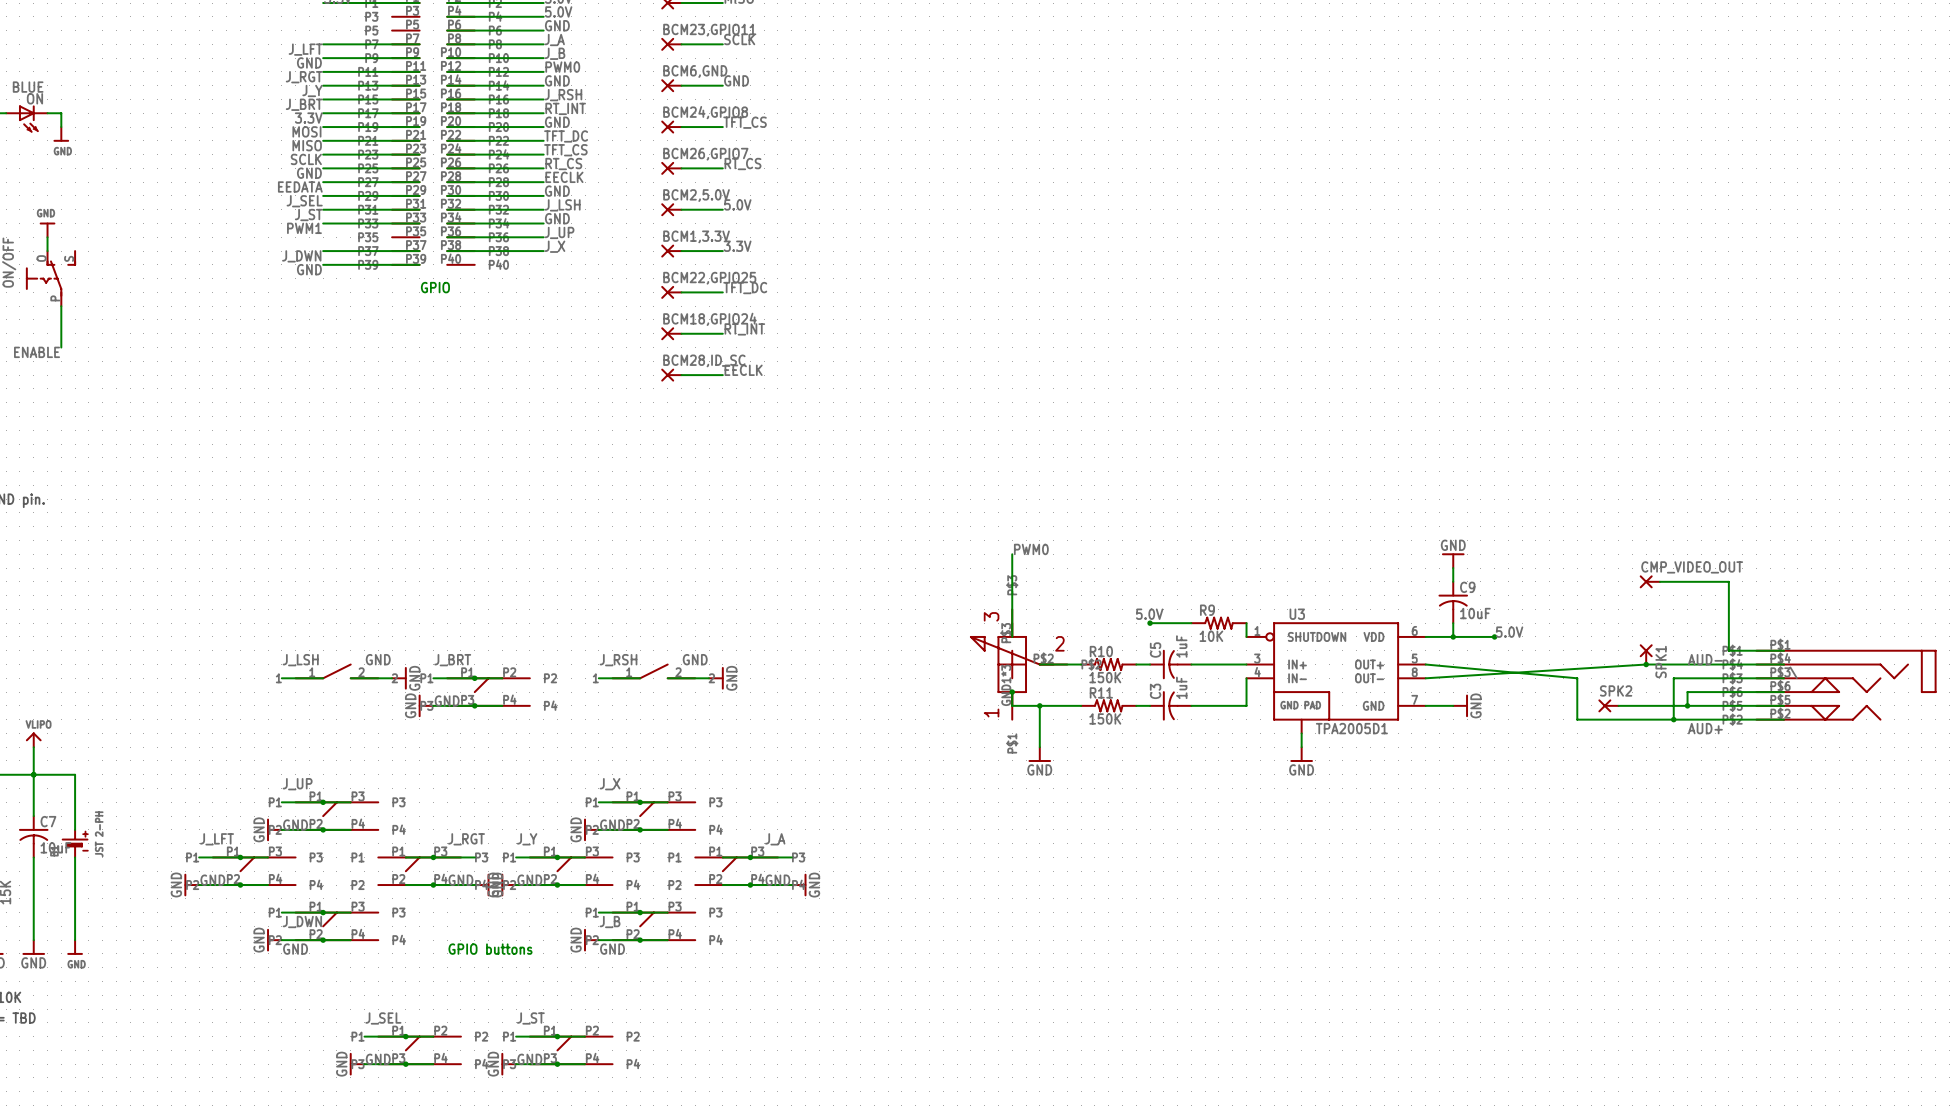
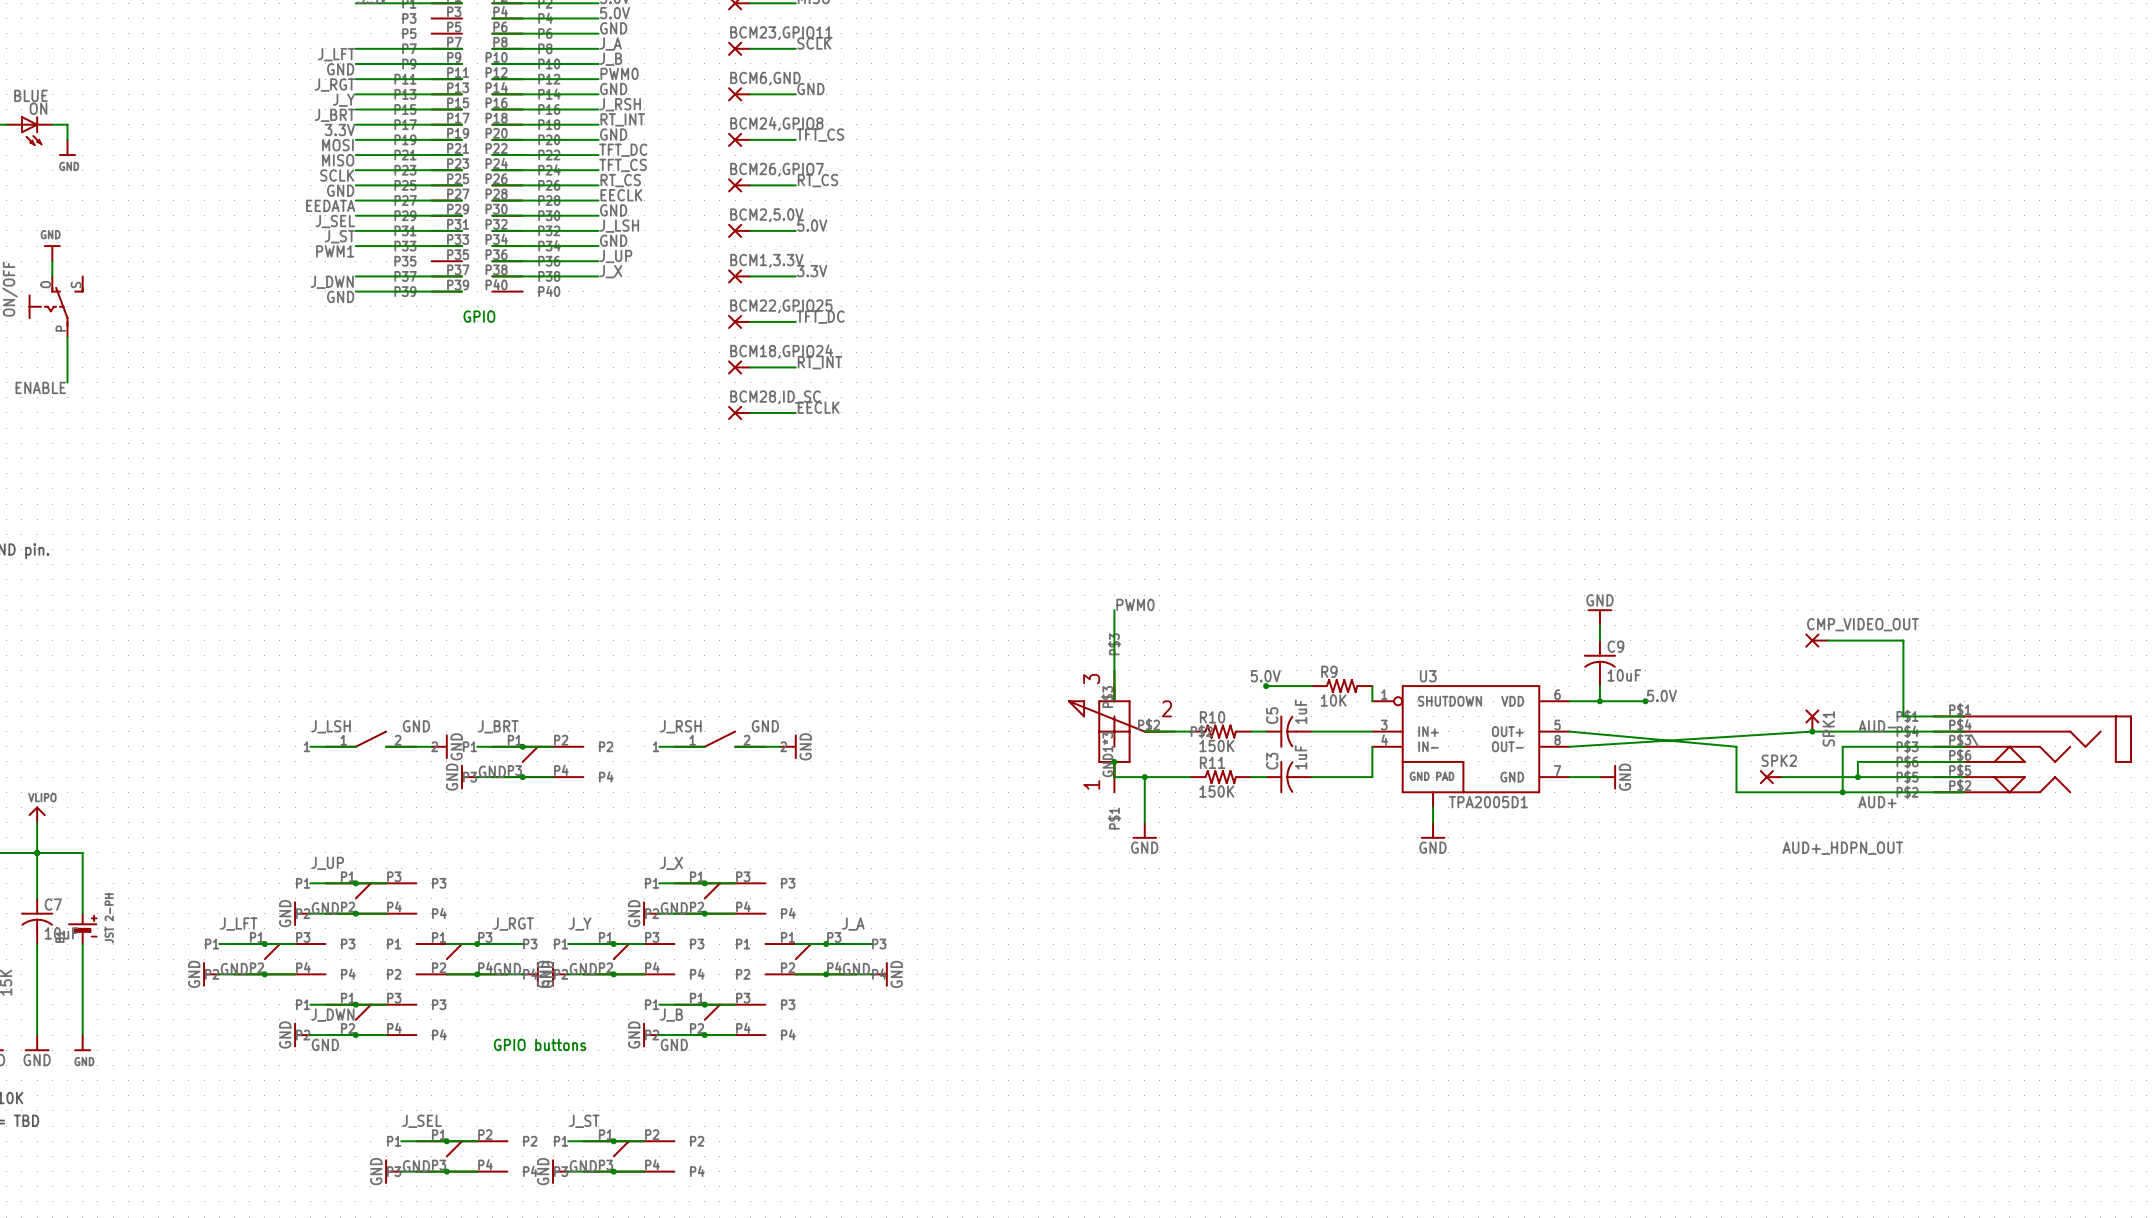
label: none -> AUD+_HDPN_OUT (1842, 848)

